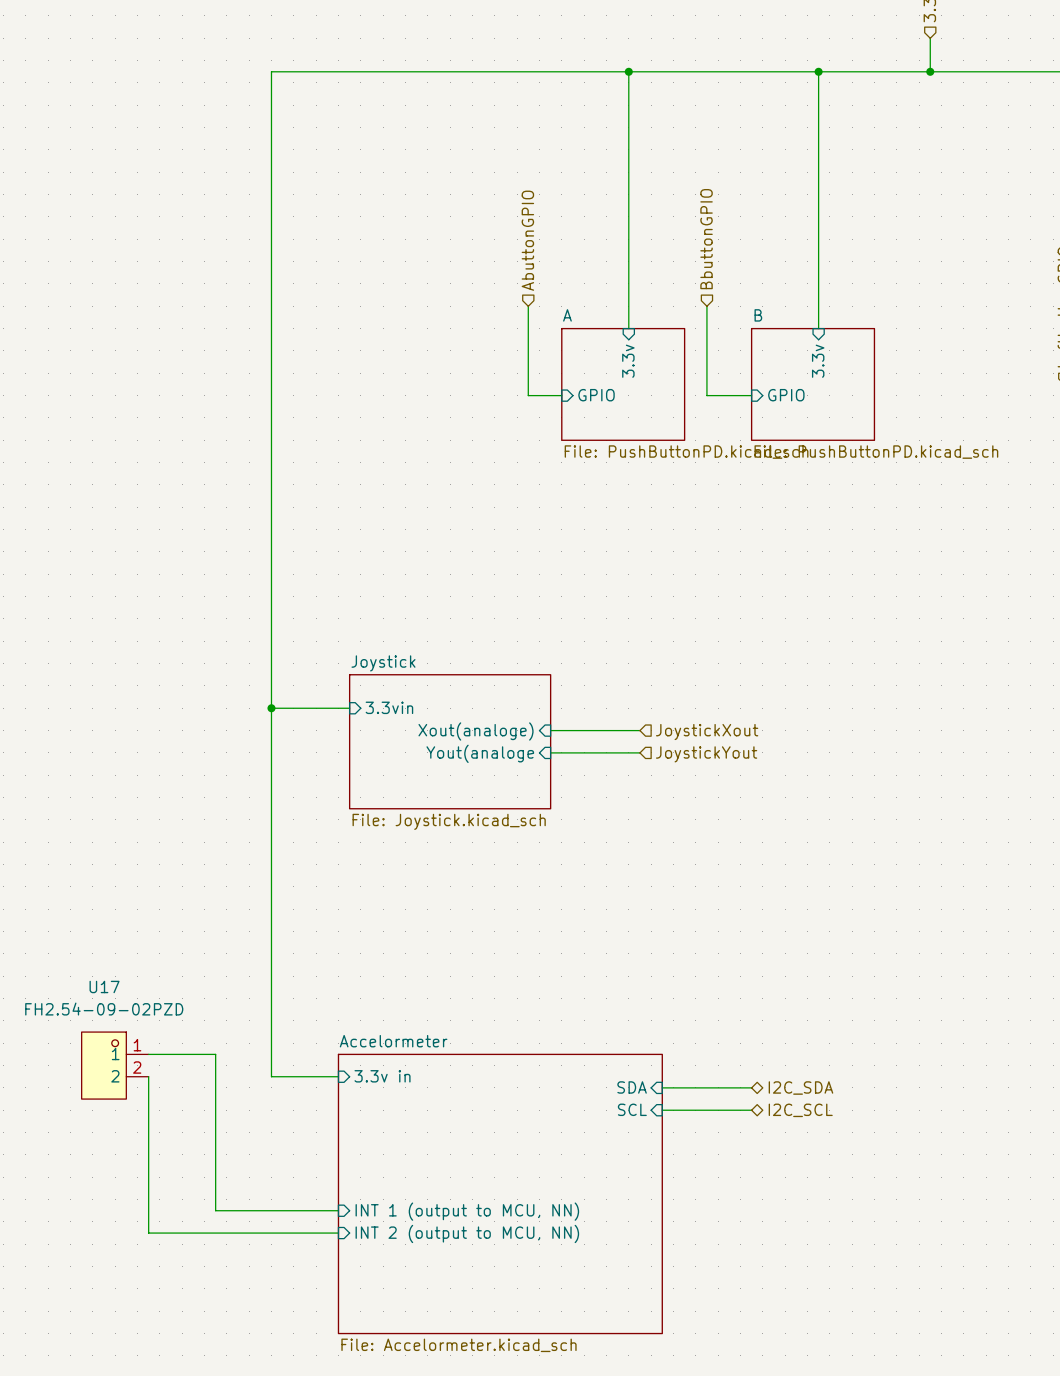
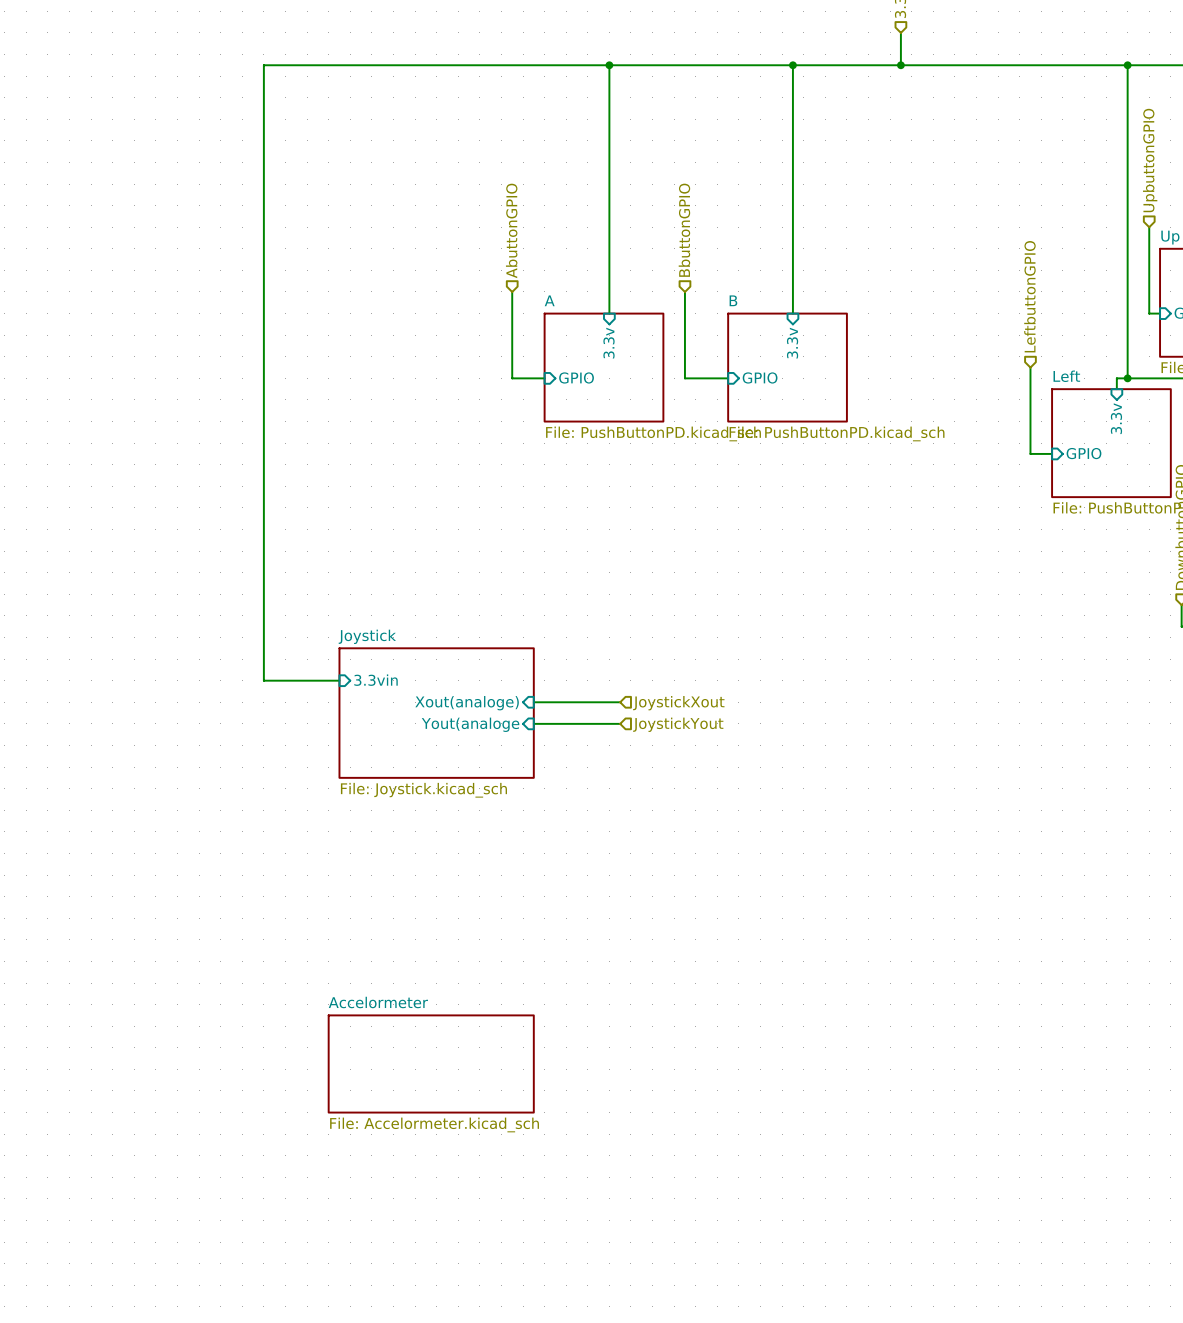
wire: (271, 708) (271, 1076) (338, 1076) -> none
junction: (271, 708) -> none
wire: (148, 1054) (215, 1054) (215, 1210) (338, 1210) -> none
U17: FH2.54-09-02PZD (115, 1065) -> none
wire: (148, 1076) (148, 1233) (338, 1233) -> none
sheet pin: 3.3v in (382, 1076) -> none
sheet pin: SDA (632, 1087) -> none
wire: (662, 1087) (751, 1087) -> none
hierarchical label: I2C_SDA (800, 1088) -> none
sheet Accelormeter: none -> File: Accelormeter.kicad_sch (431, 1063)
sheet pin: SCL (632, 1109) -> none
wire: (662, 1110) (751, 1110) -> none
hierarchical label: I2C_SCL (800, 1110) -> none
sheet Accelormeter: File: Accelormeter.kicad_sch (500, 1193) -> none
sheet pin: INT 1 (output to MCU, NN) (467, 1211) -> none
sheet pin: INT 2 (output to MCU, NN) (467, 1233) -> none

